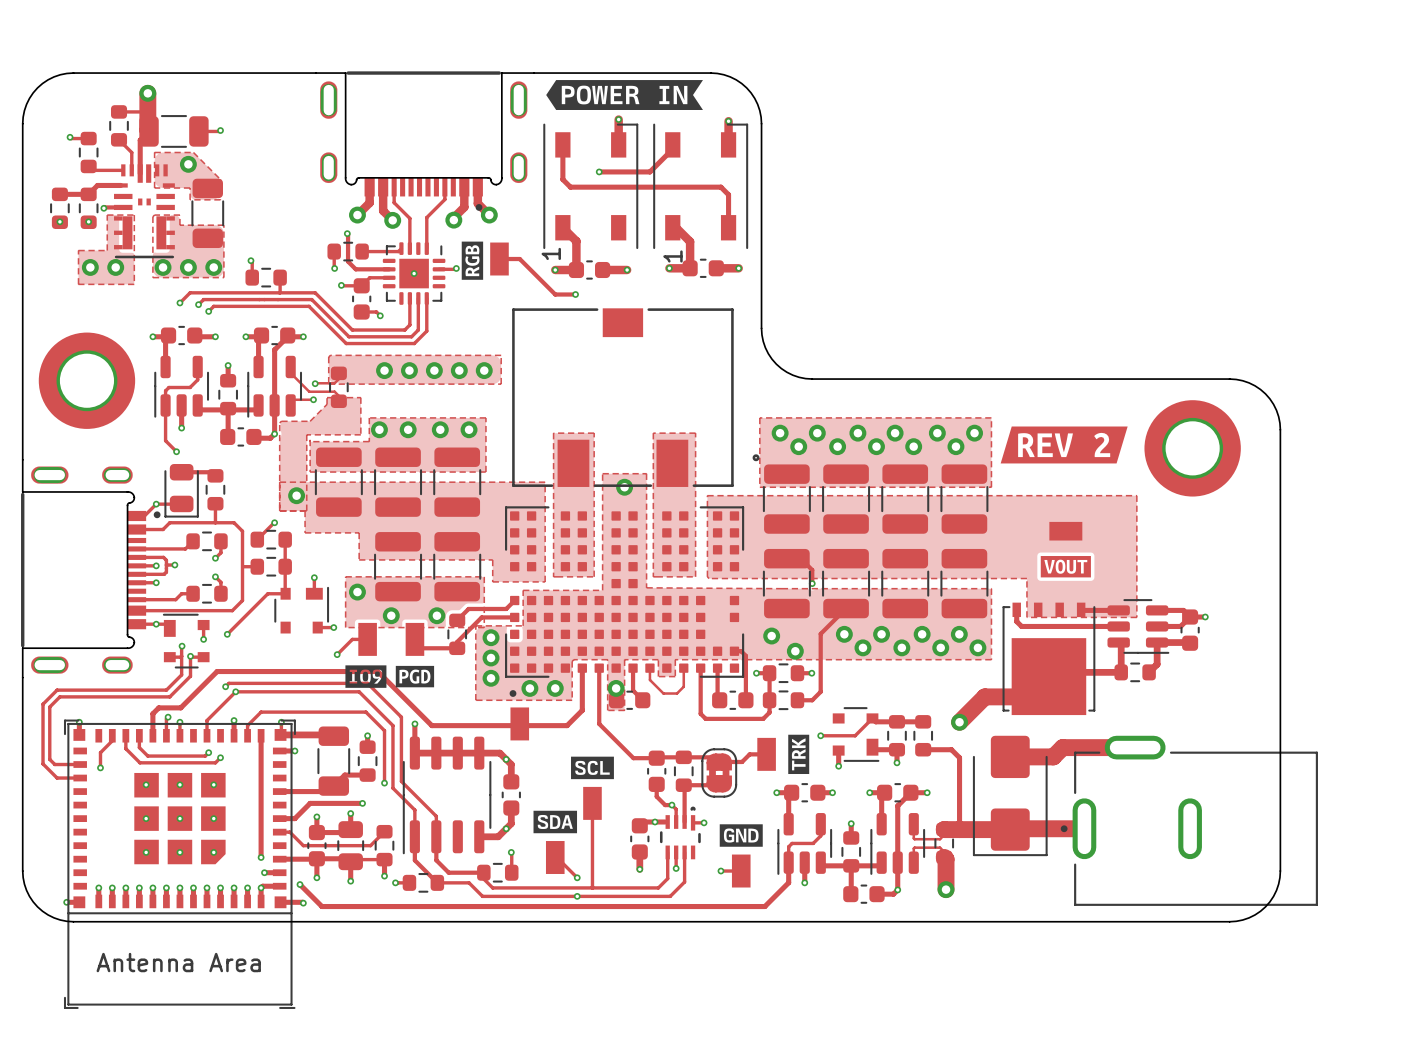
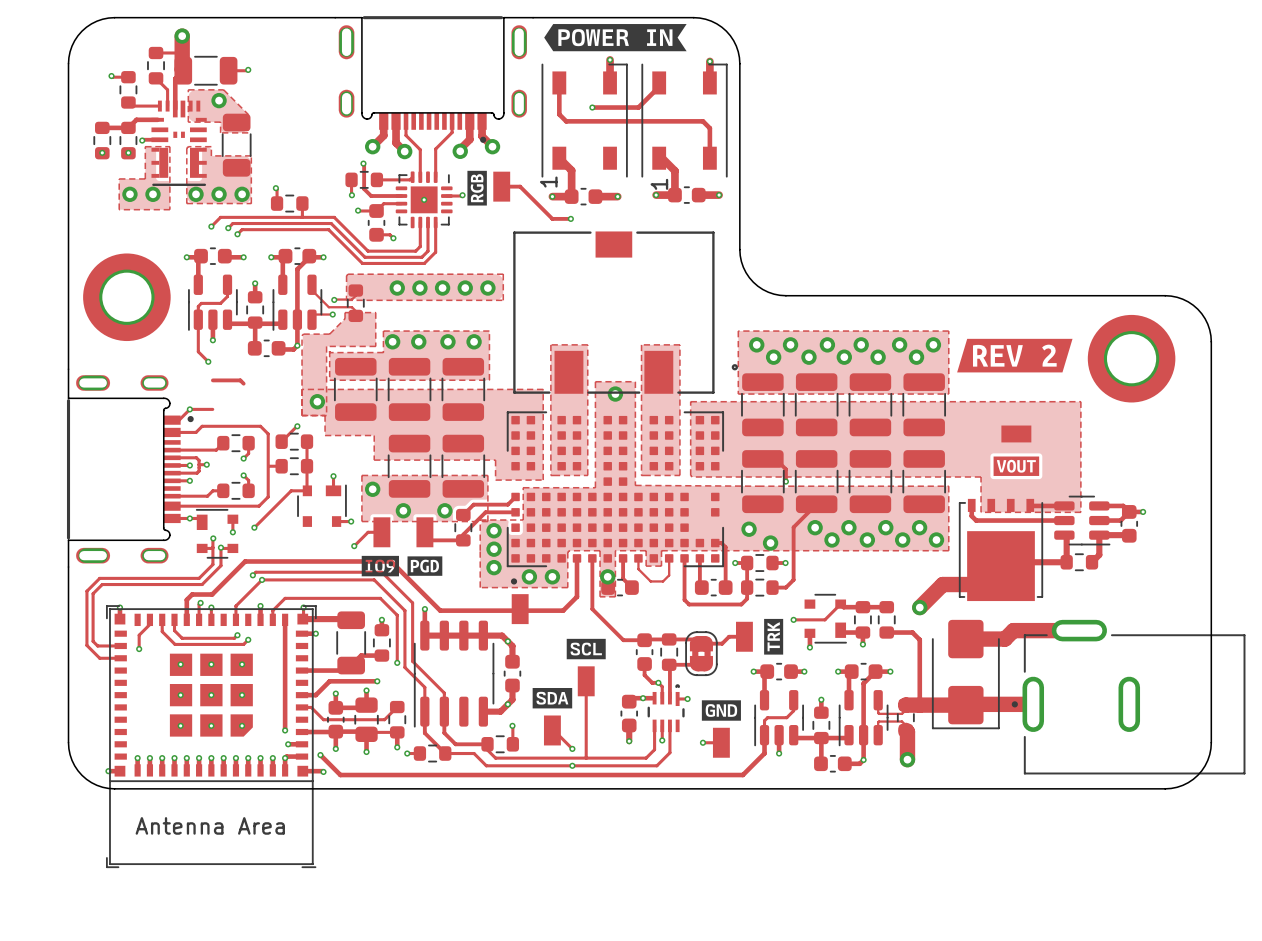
part: (215, 489) -> none
part: (181, 490) -> none
track: (215, 503) (215, 522) -> none

